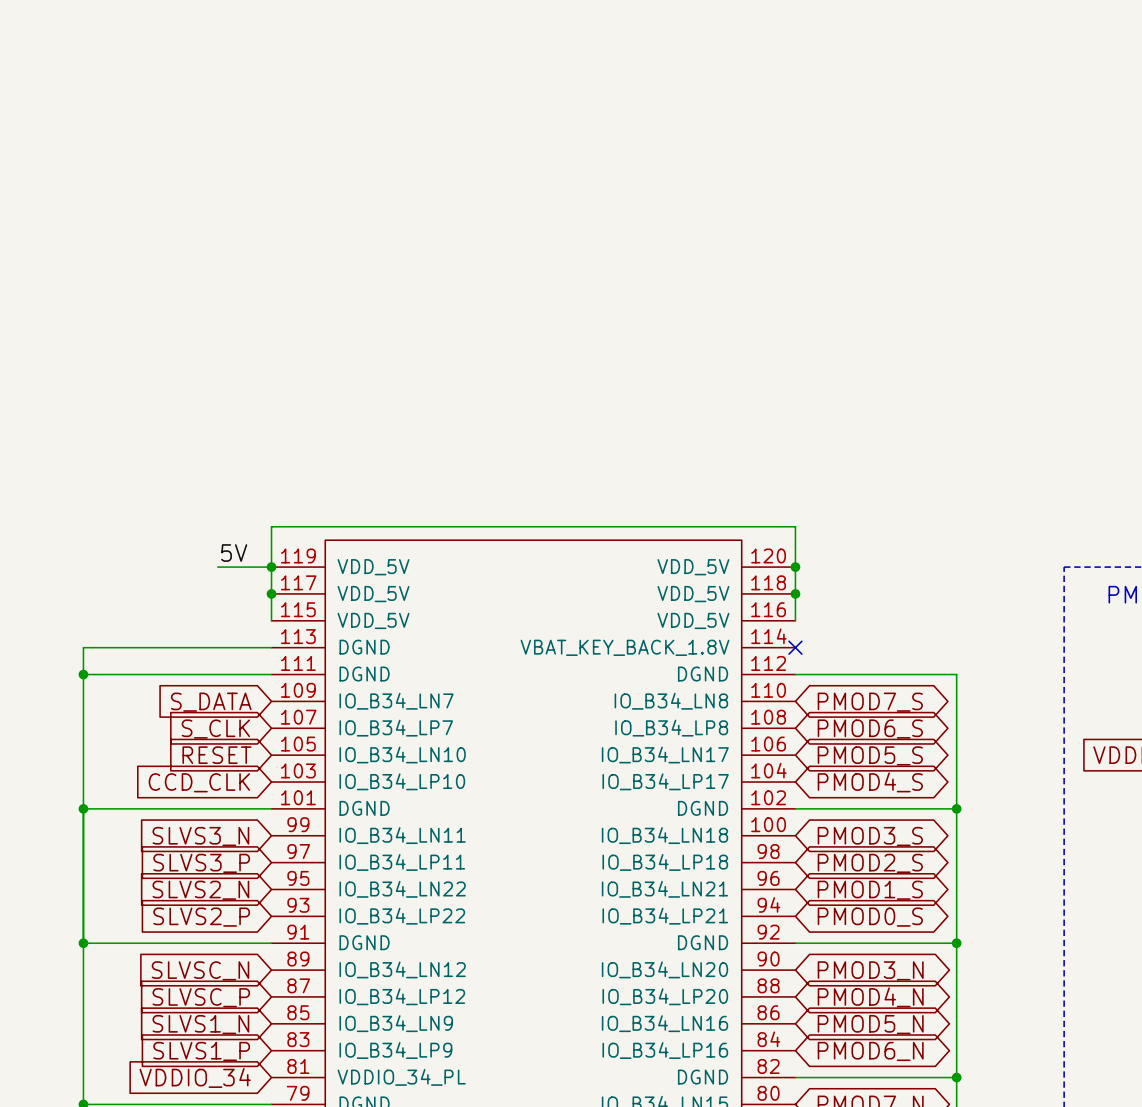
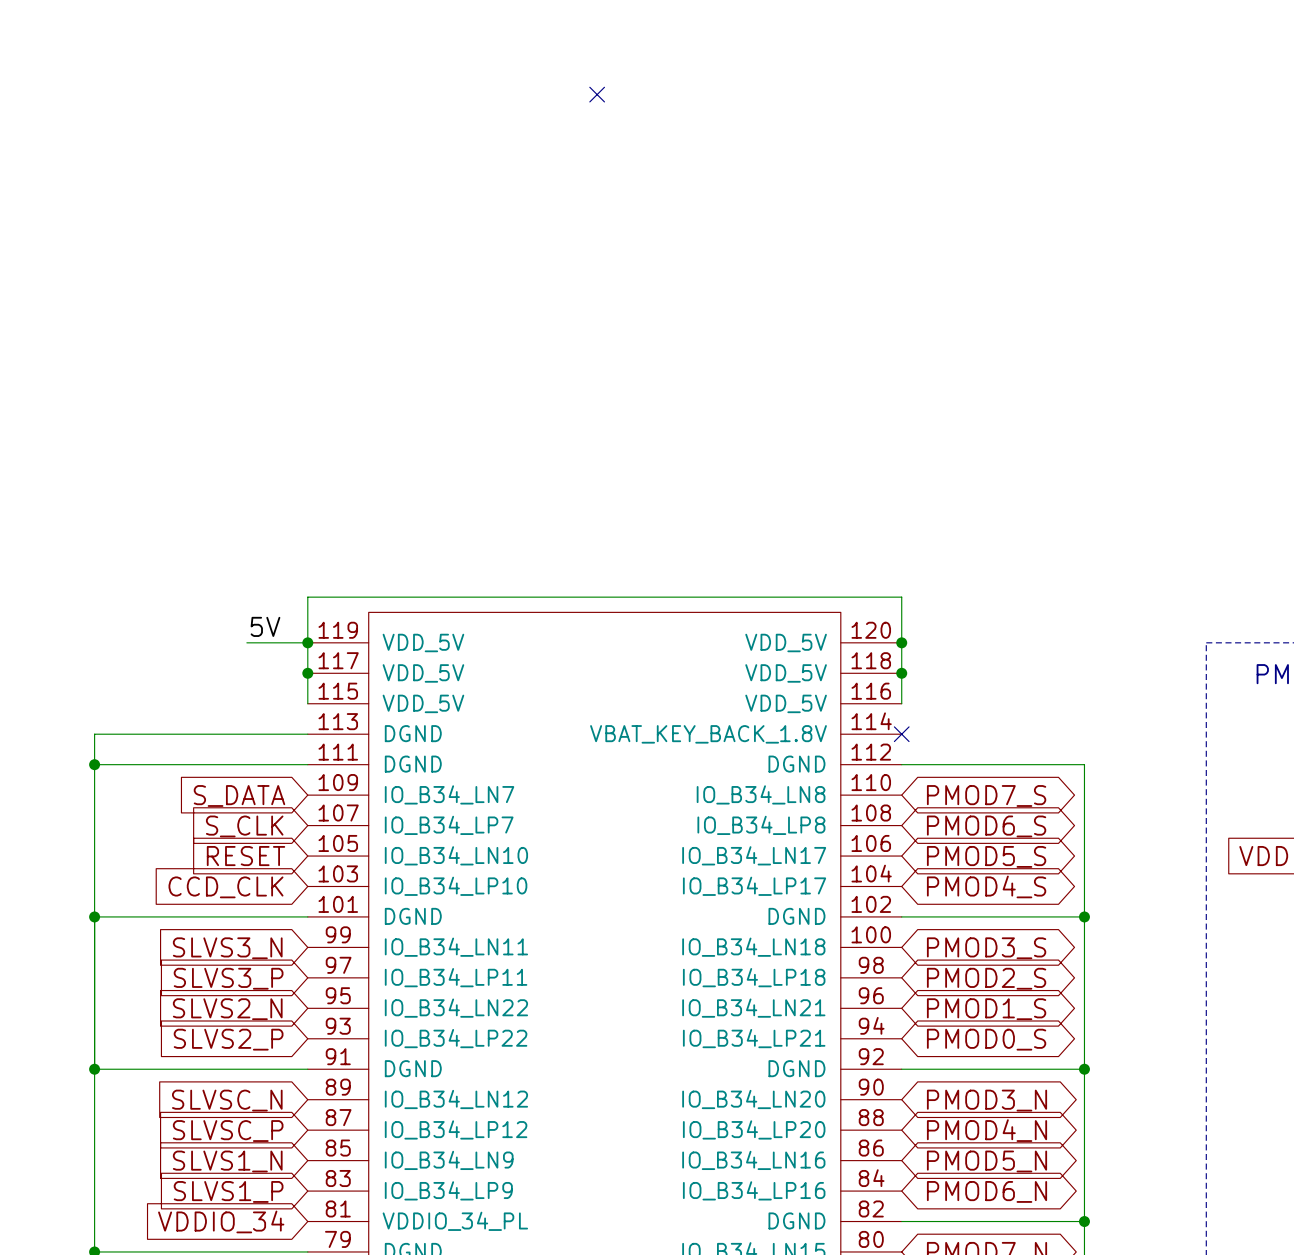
no-connect mark: none -> (597, 94)

